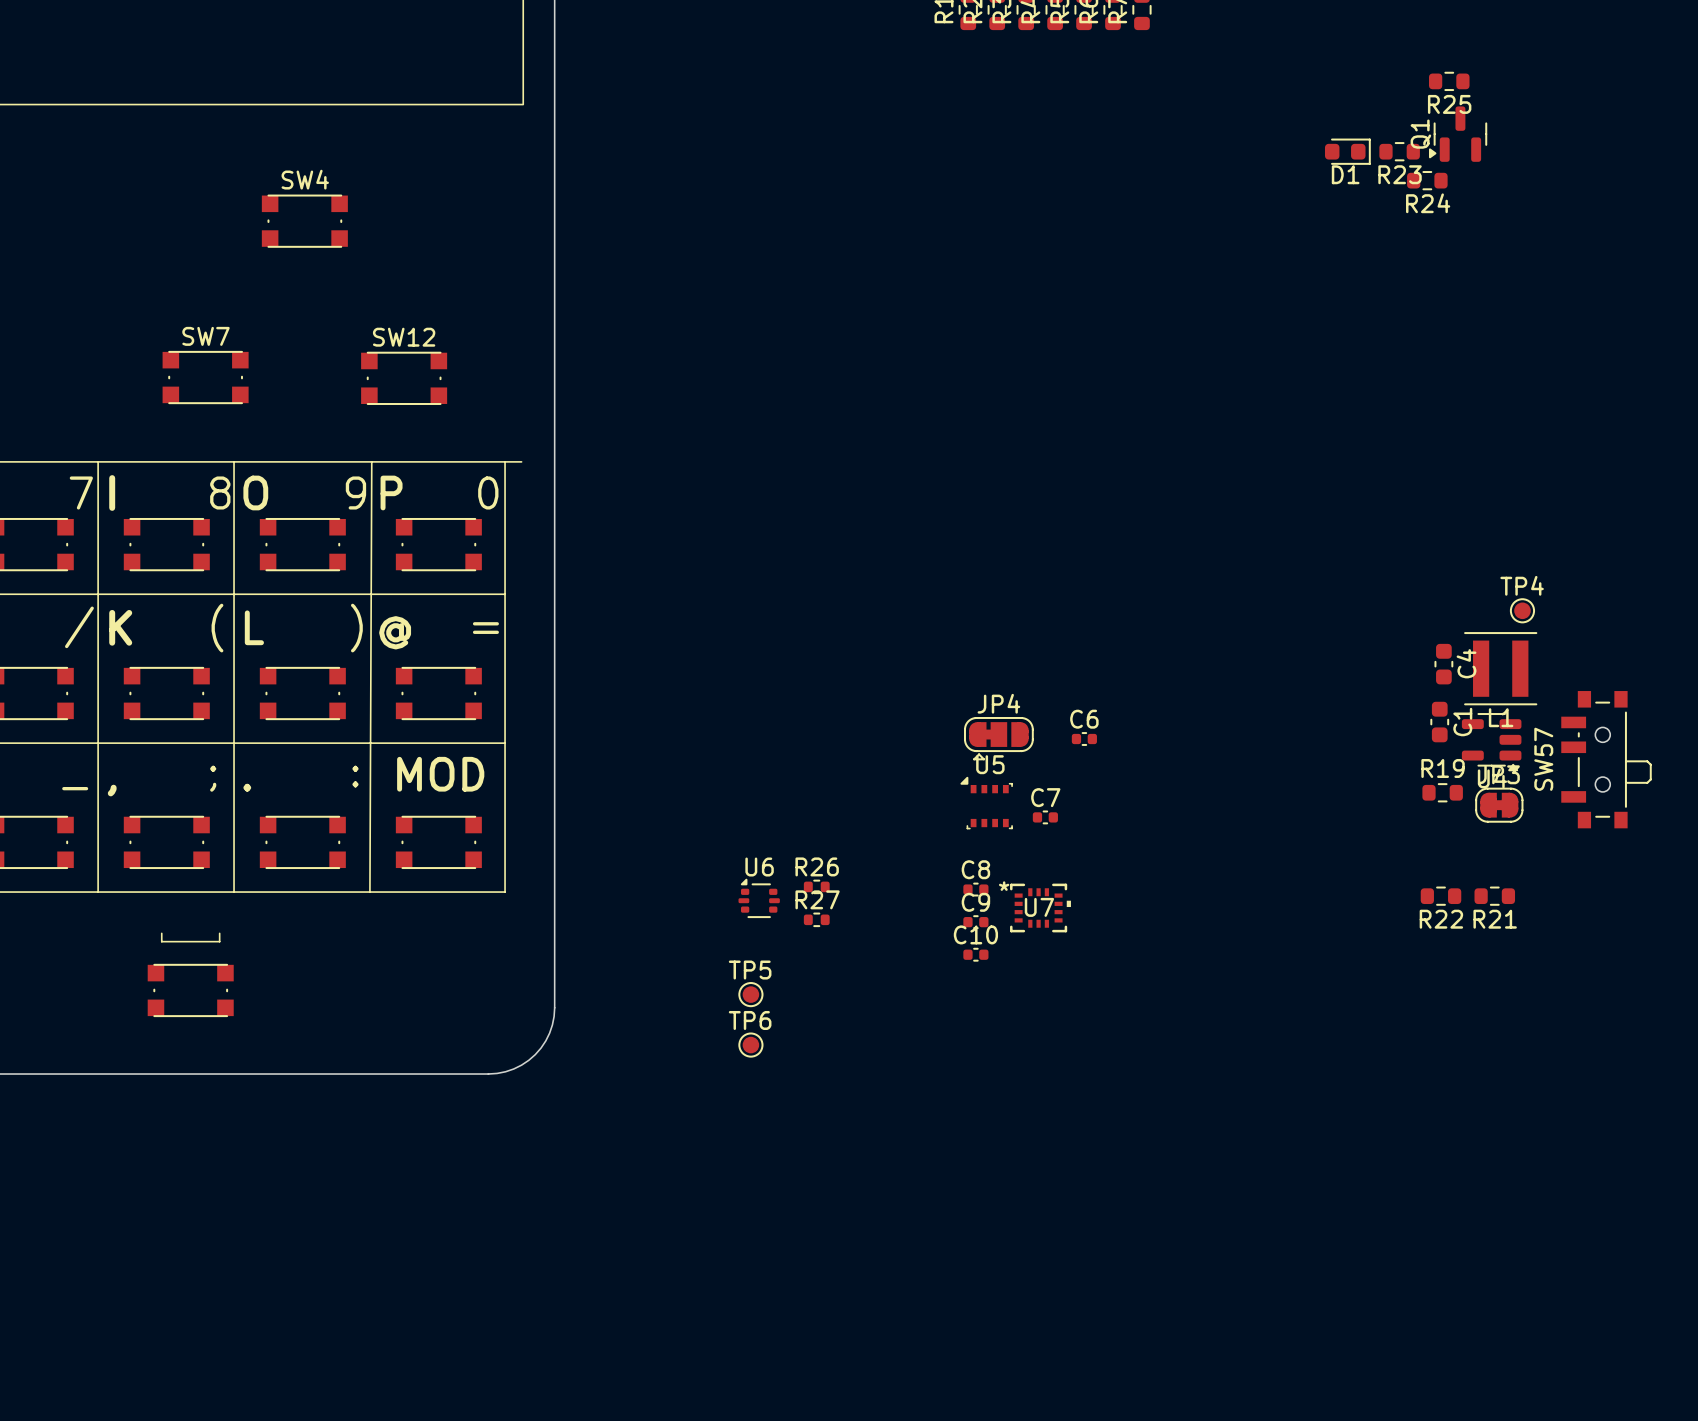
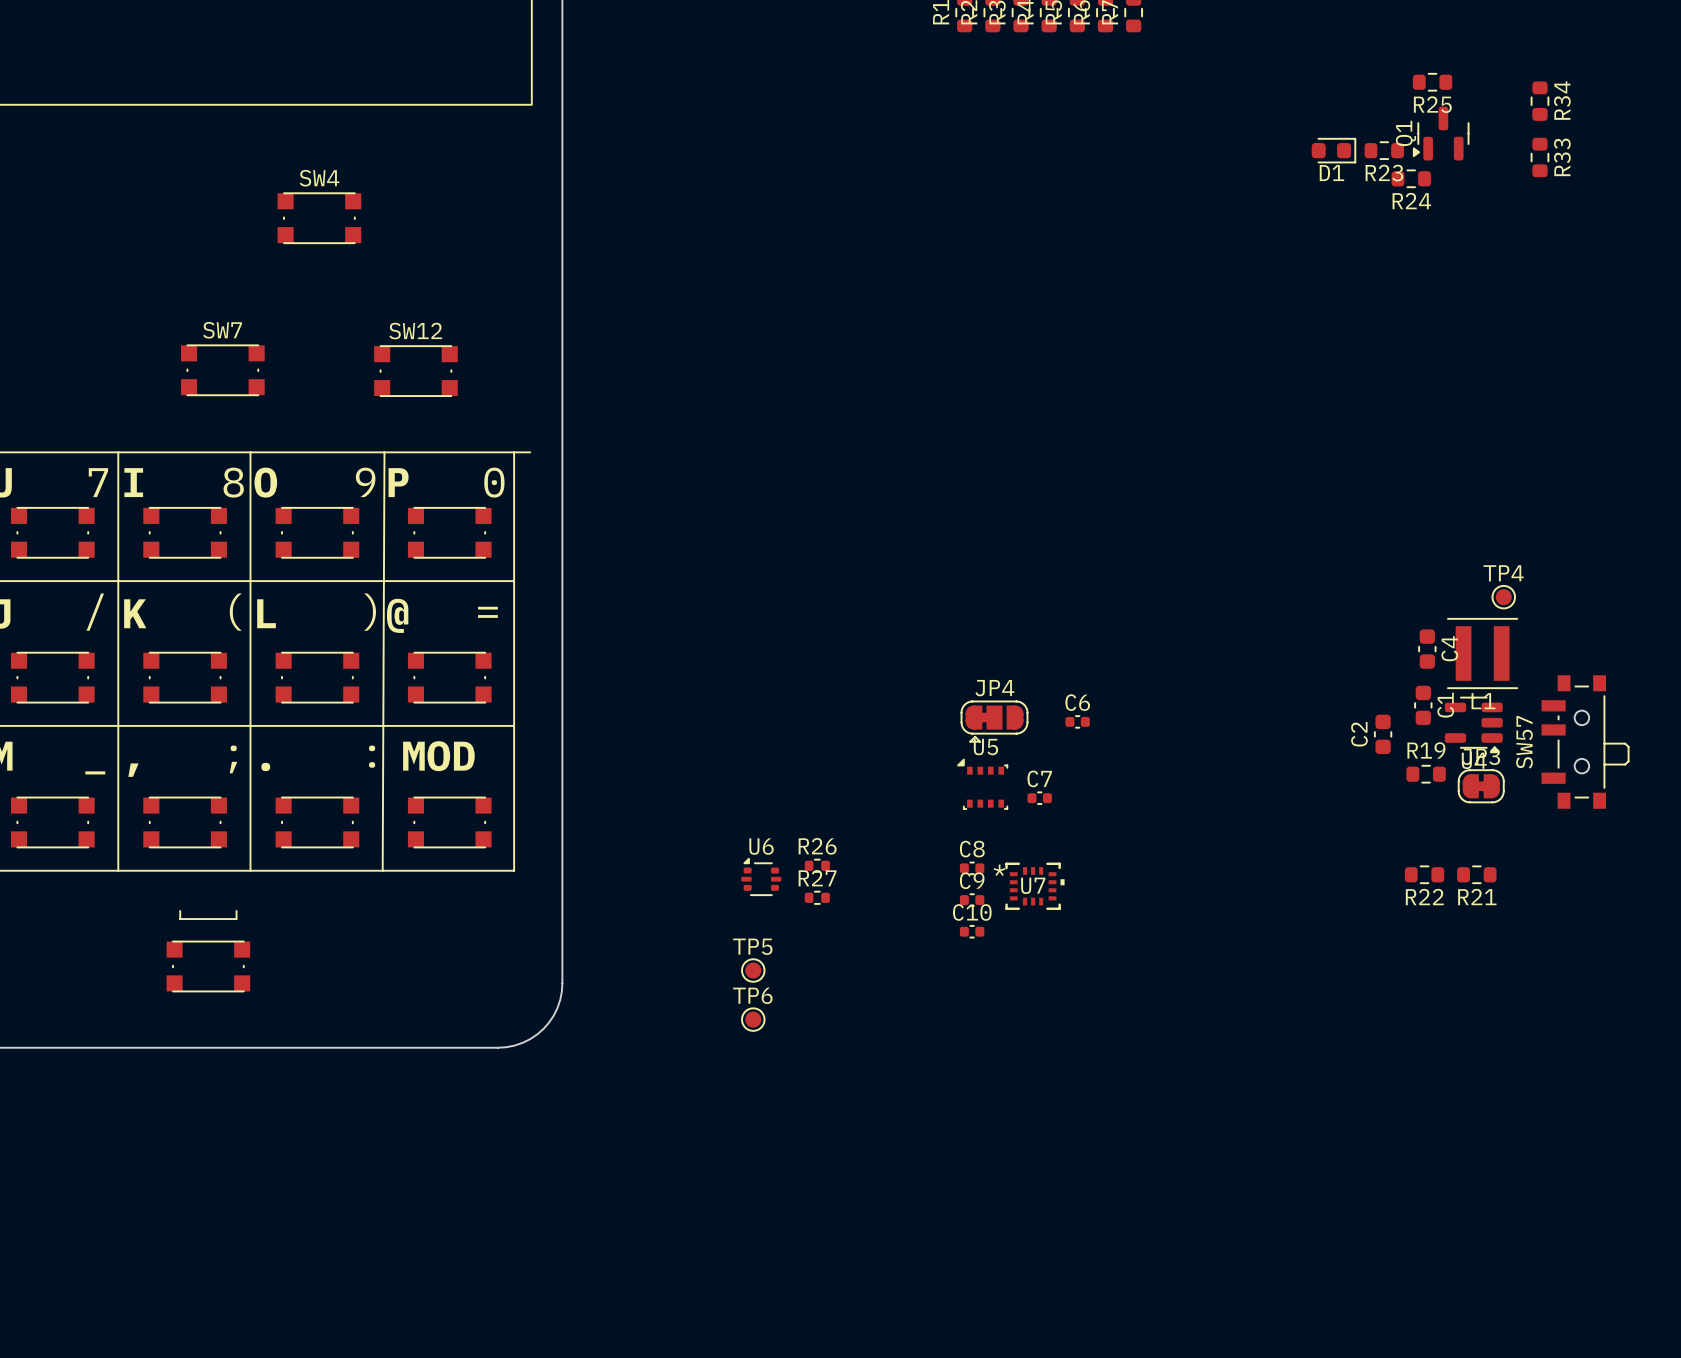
R34: none -> (1539, 101)
R33: none -> (1539, 157)
C2: none -> (1383, 734)

